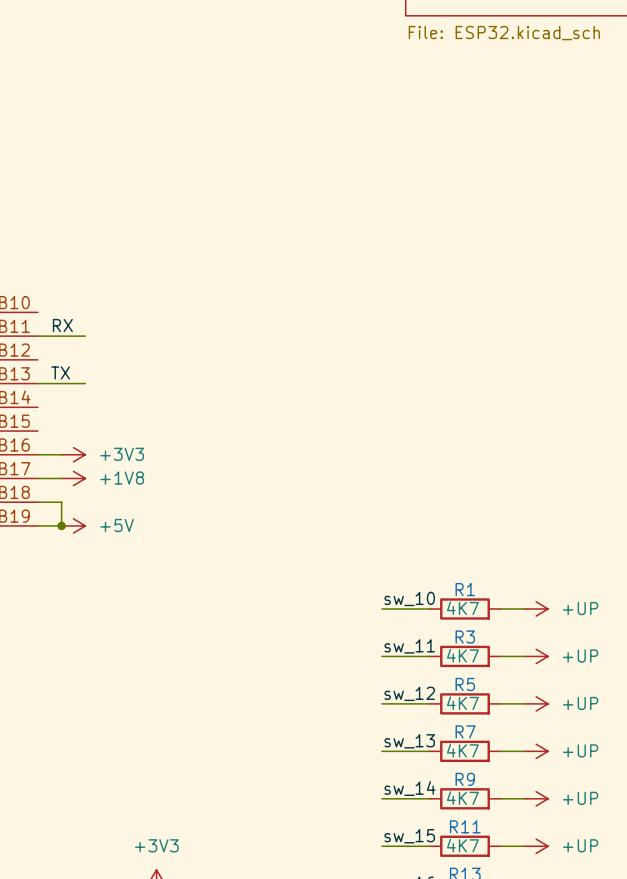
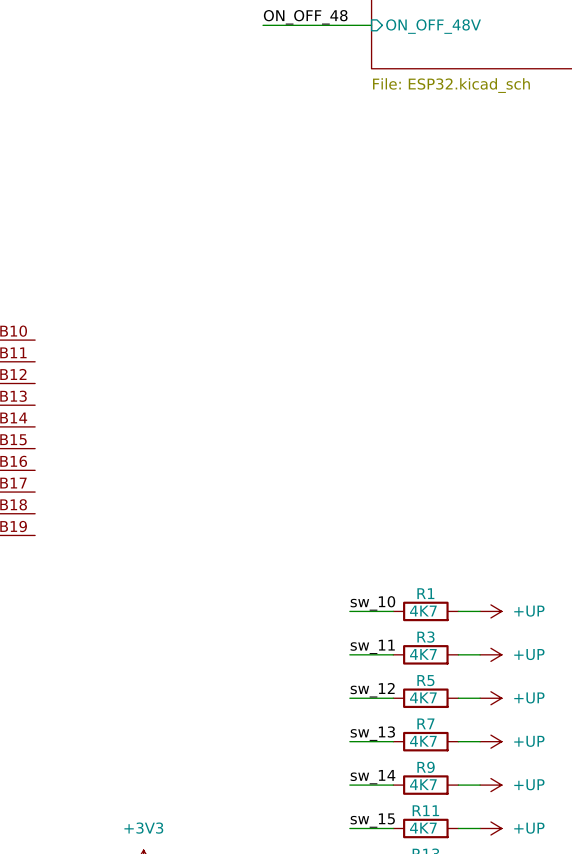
label: RX (62, 325) -> none
wire: (37, 336) (85, 336) -> none
label: TX (60, 372) -> none
wire: (37, 383) (85, 383) -> none
wire: (37, 454) (61, 454) -> none
power symbol: +3V3 (73, 454) -> none
wire: (37, 478) (61, 478) -> none
power symbol: +1V8 (73, 478) -> none
wire: (37, 502) (61, 502) (61, 525) (37, 525) -> none
junction: (61, 525) -> none
power symbol: +5V (73, 525) -> none

